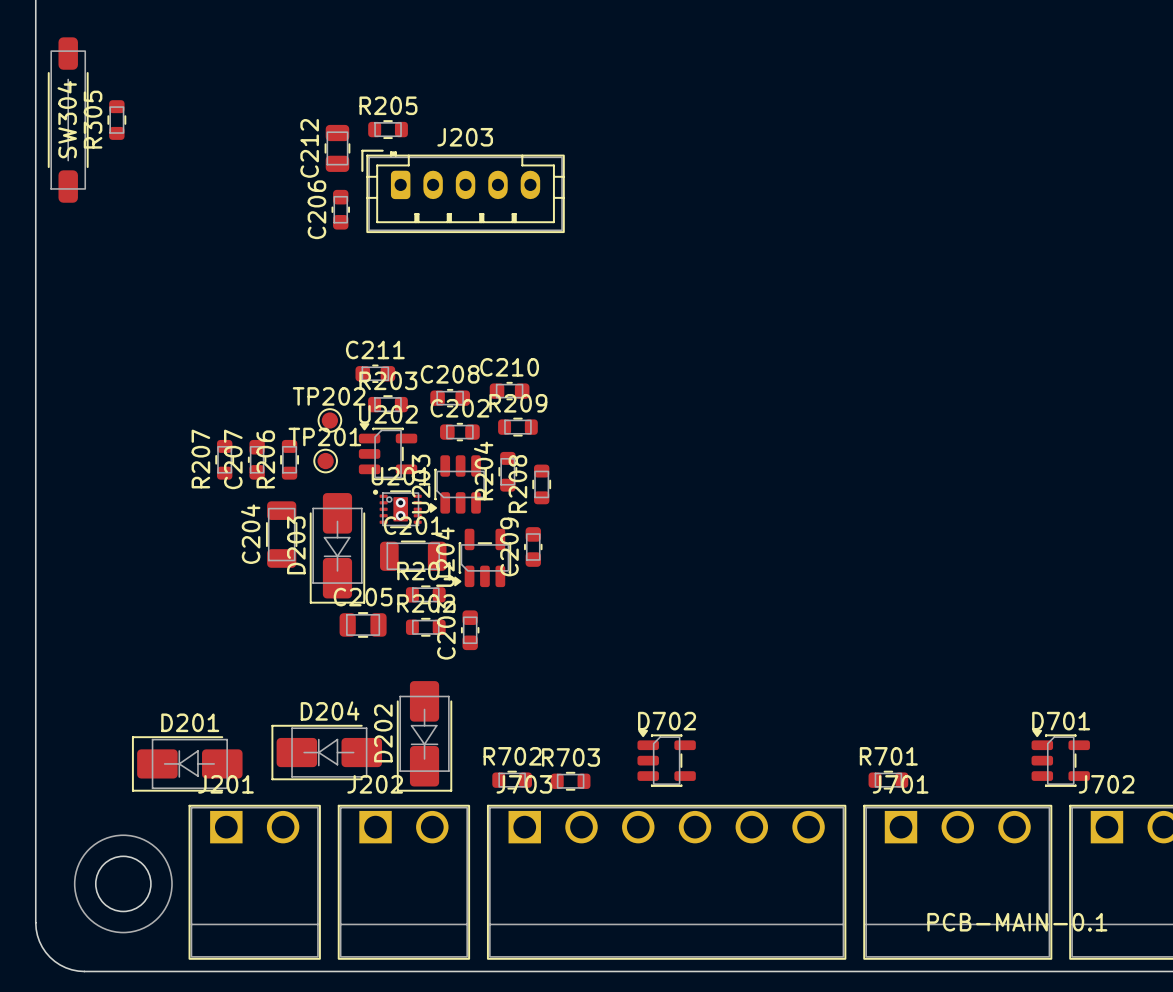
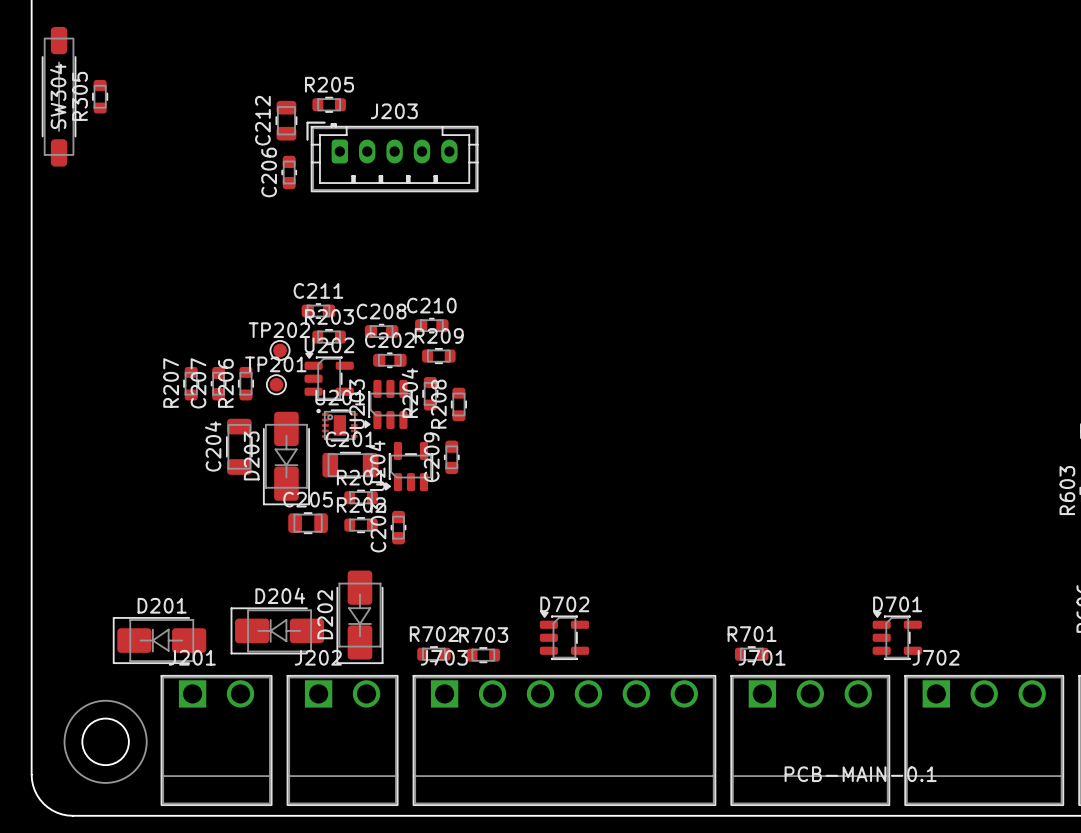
via: (400, 502) -> none
via: (400, 515) -> none

